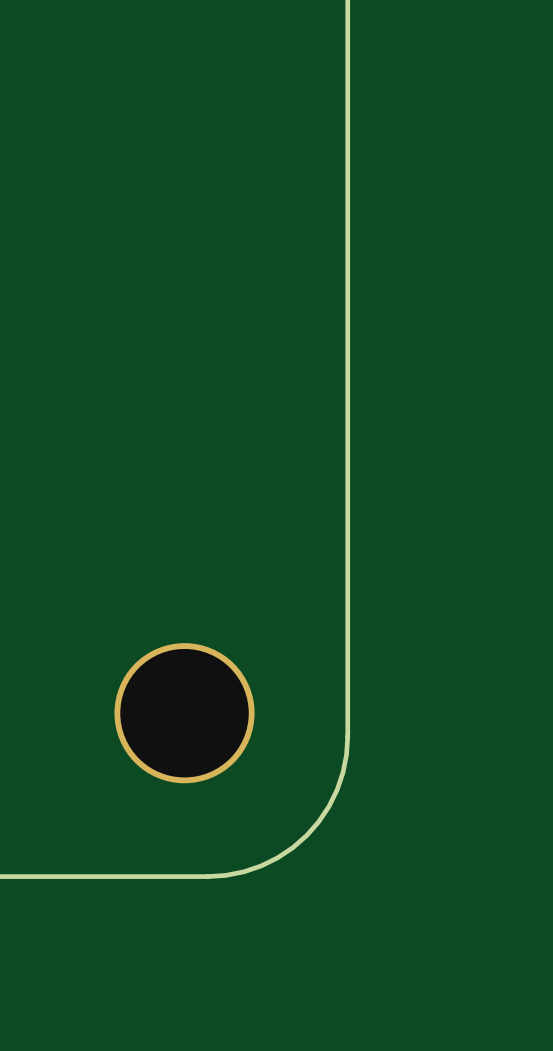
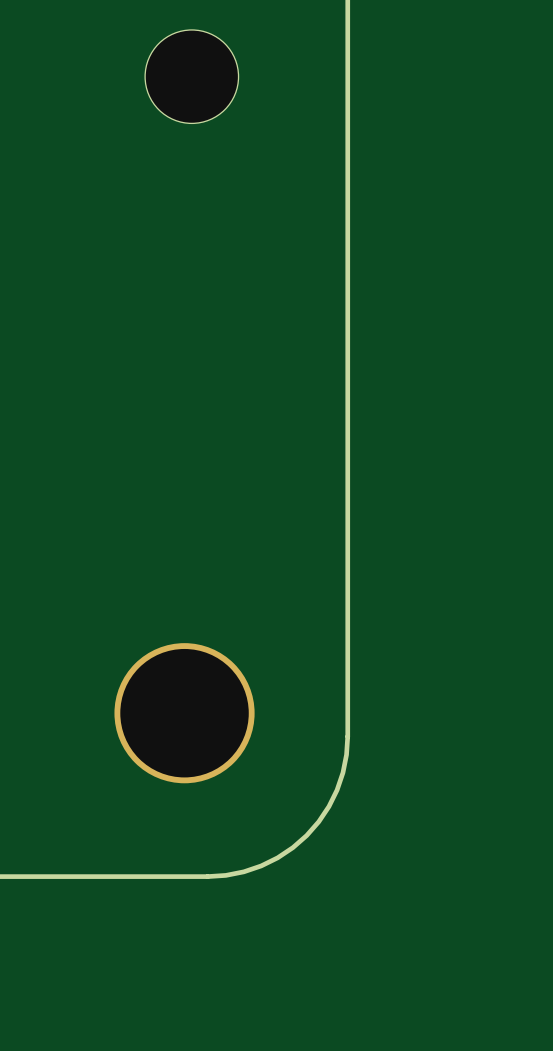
part: none -> (191, 76)

